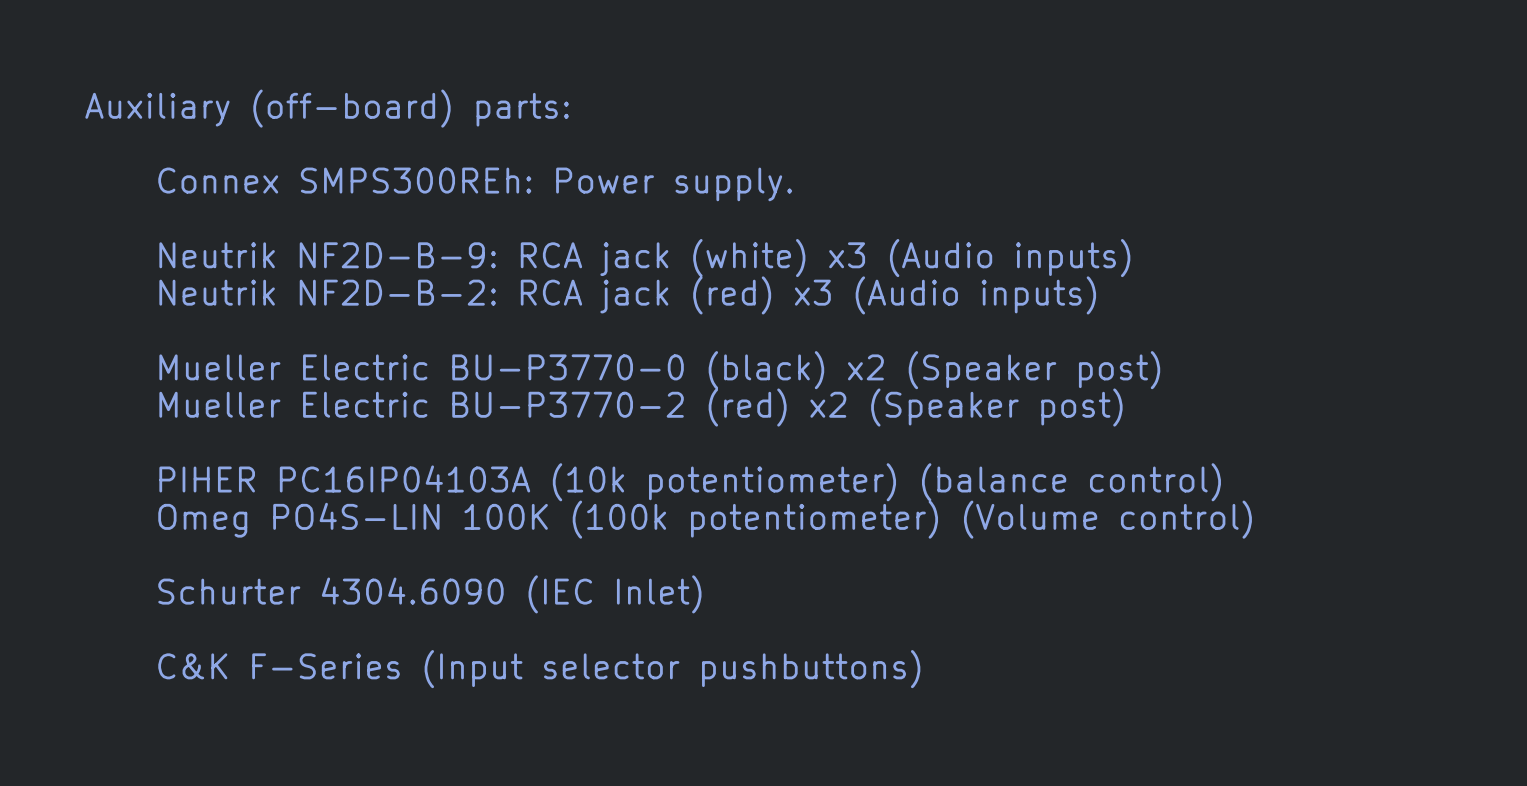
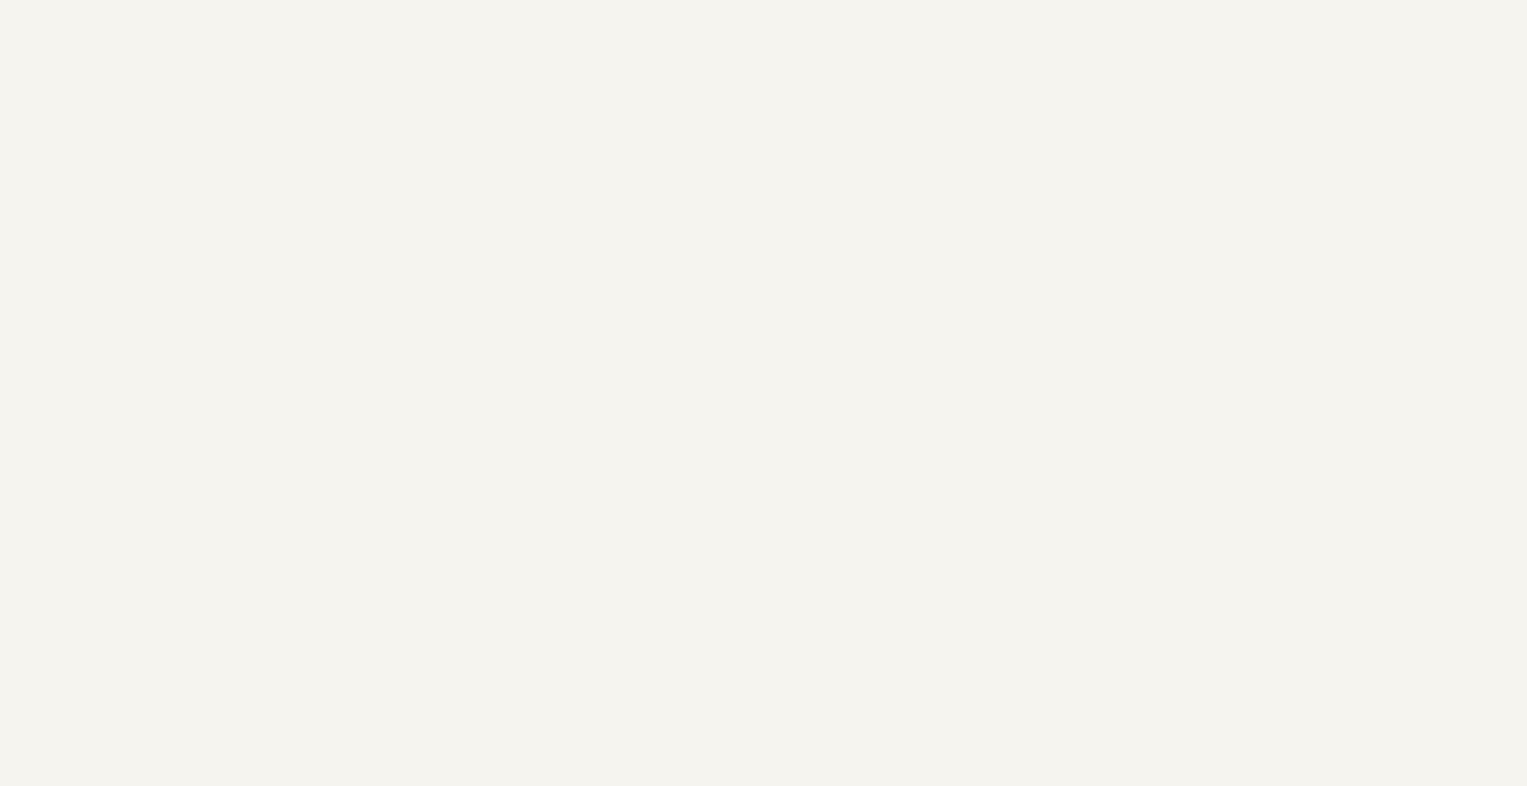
text: Auxiliary (off-board) parts: (327, 108) -> none
text: Connex SMPS300REh: Power supply. (475, 184) -> none
text: Neutrik NF2D-B-9: RCA jack (white) x3 (Audio inputs) (644, 258) -> none
text: Neutrik NF2D-B-2: RCA jack (red) x3 (Audio inputs) (627, 295) -> none
text: Mueller Electric BU-P3770-0 (black) x2 (Speaker post) (659, 370) -> none
text: Mueller Electric BU-P3770-2 (red) x2 (Speaker post) (640, 407) -> none
text: PIHER PC16IP04103A (10k potentiometer) (balance control) (690, 482) -> none
text: Omeg PO4S-LIN 100K (100k potentiometer) (Volume control) (705, 519) -> none
text: Schurter 4304.6090 (IEC Inlet) (429, 594) -> none
text: C&K F-Series (Input selector pushbuttons) (539, 669) -> none

